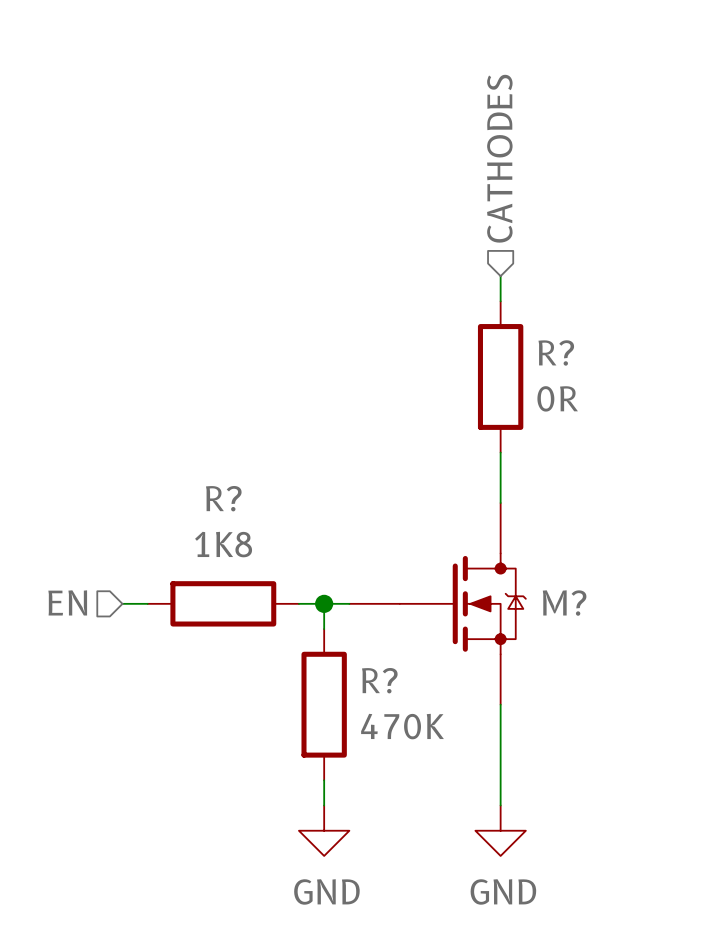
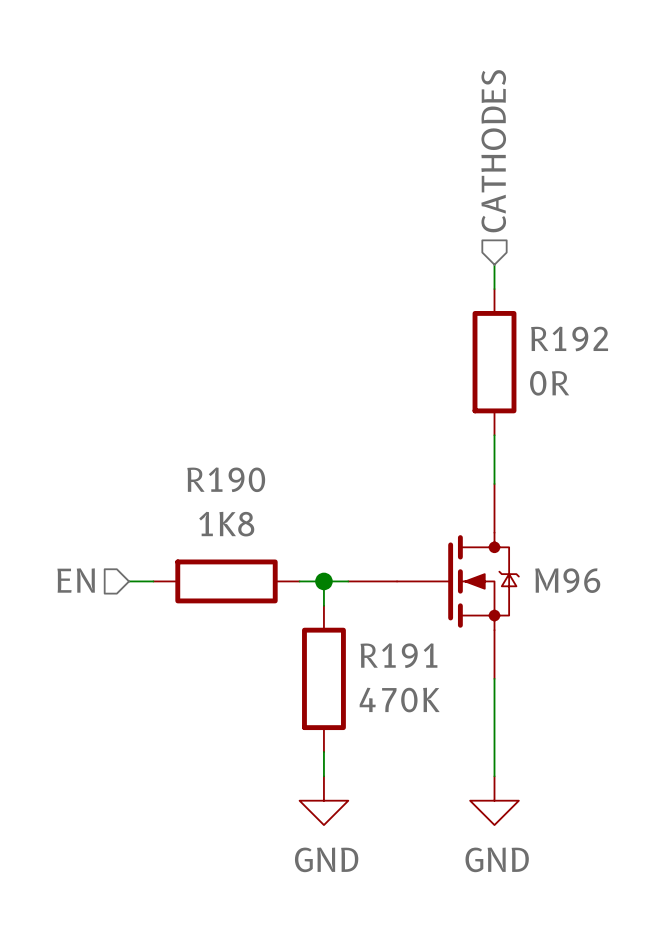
R? name: R? (556, 352) -> R192 (569, 338)
R? name: R? (223, 498) -> R190 (226, 479)
M? name: M? (564, 603) -> M96 (567, 580)
R? name: R? (379, 680) -> R191 (398, 655)

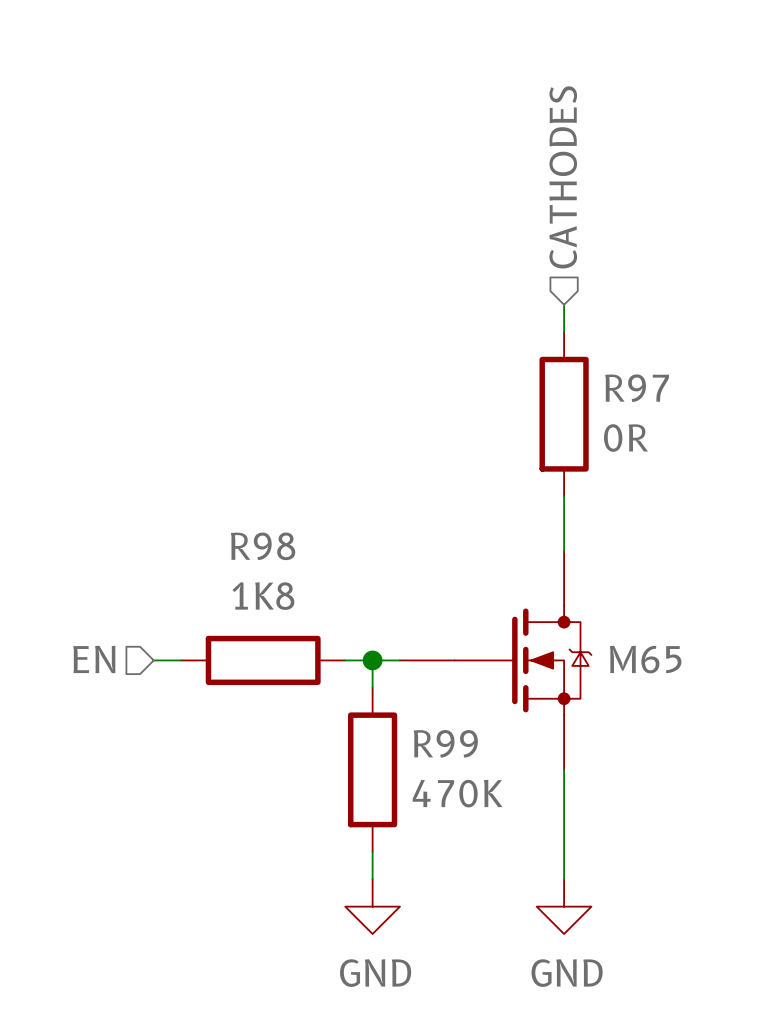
R192 name: R192 (569, 338) -> R97 (637, 388)
R190 name: R190 (226, 479) -> R98 (263, 546)
M96 name: M96 (567, 580) -> M65 (645, 659)
R191 name: R191 (398, 655) -> R99 (445, 743)

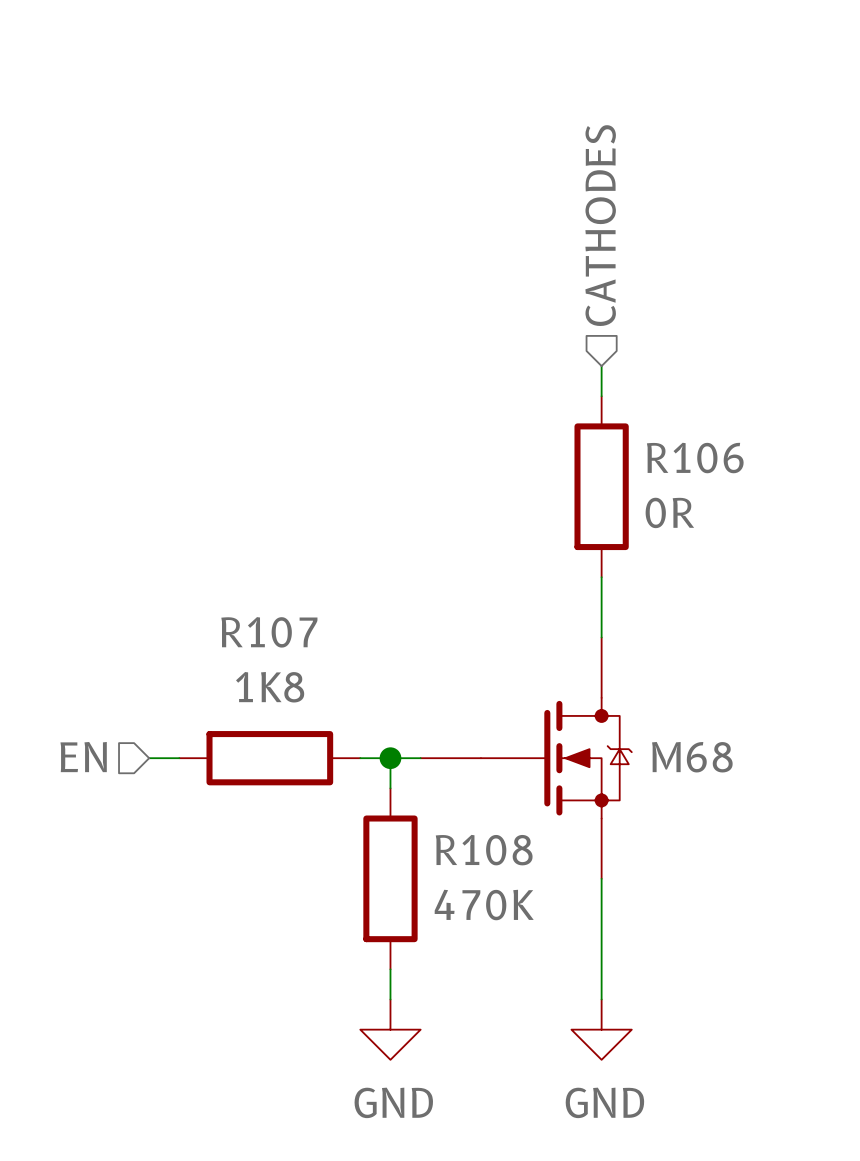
R97 name: R97 (637, 388) -> R106 (695, 458)
R98 name: R98 (263, 546) -> R107 (269, 632)
M65 name: M65 (645, 659) -> M68 (692, 757)
R99 name: R99 (445, 743) -> R108 (484, 850)

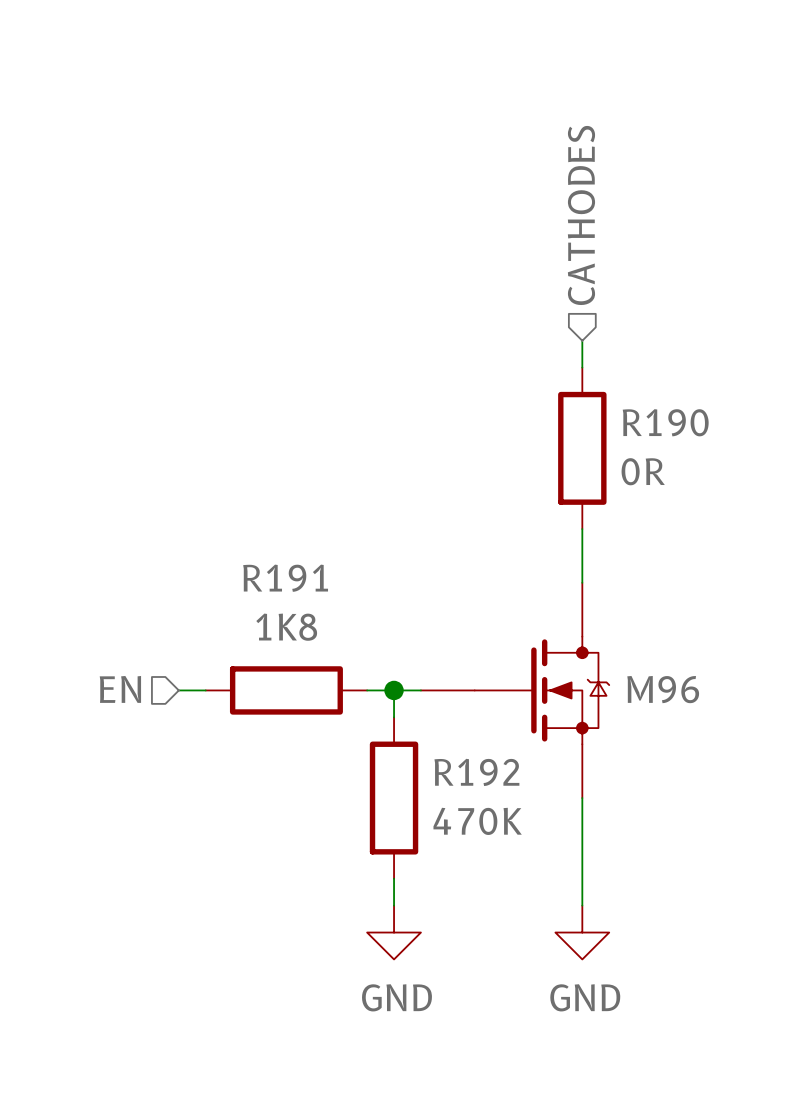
R106 name: R106 (695, 458) -> R190 (665, 422)
R107 name: R107 (269, 632) -> R191 (285, 578)
M68 name: M68 (692, 757) -> M96 (663, 689)
R108 name: R108 (484, 850) -> R192 (476, 772)

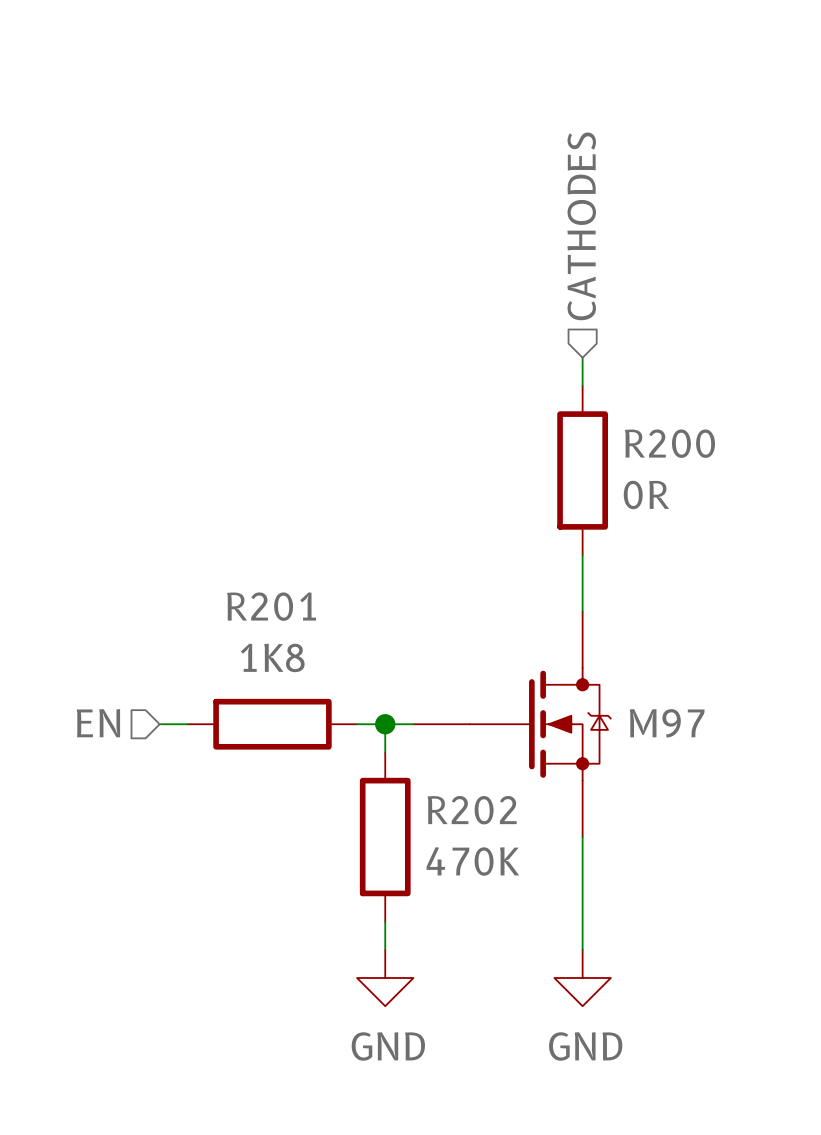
R190 name: R190 (665, 422) -> R200 (669, 443)
R191 name: R191 (285, 578) -> R201 (271, 606)
M96 name: M96 (663, 689) -> M97 (667, 723)
R192 name: R192 (476, 772) -> R202 (472, 810)

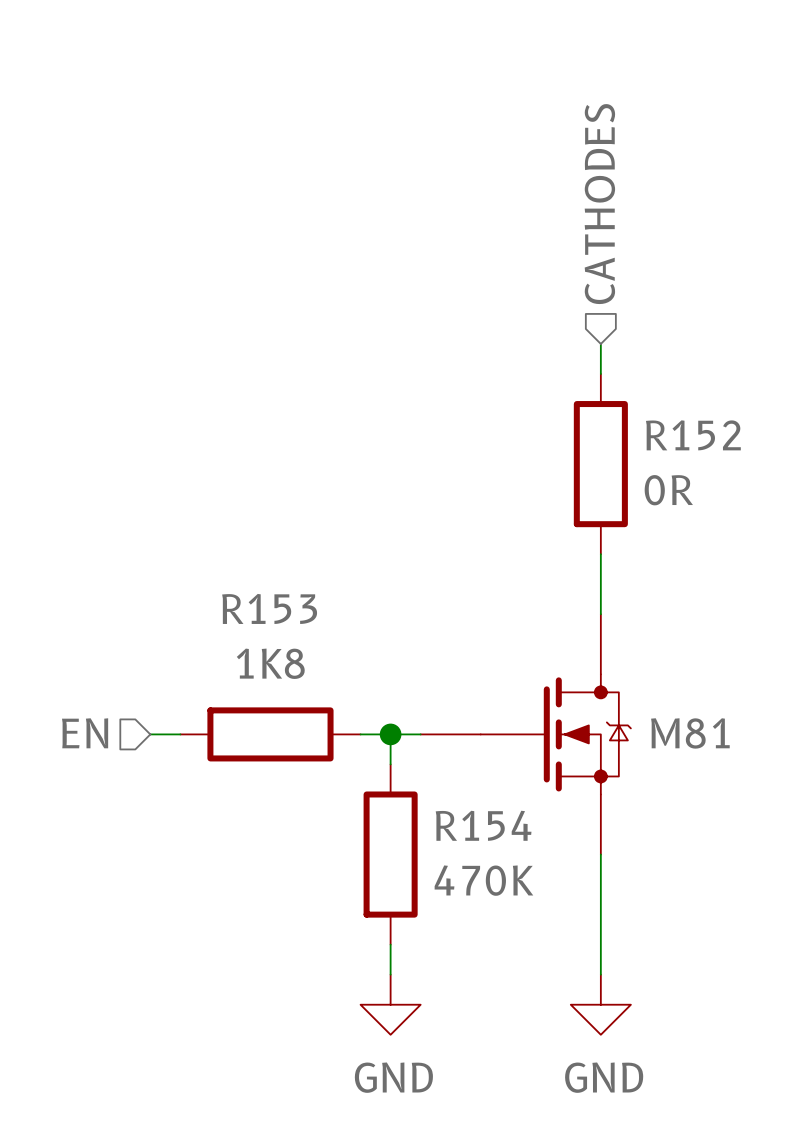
R200 name: R200 (669, 443) -> R152 (693, 435)
R201 name: R201 (271, 606) -> R153 (269, 608)
M97 name: M97 (667, 723) -> M81 (690, 733)
R202 name: R202 (472, 810) -> R154 (483, 825)

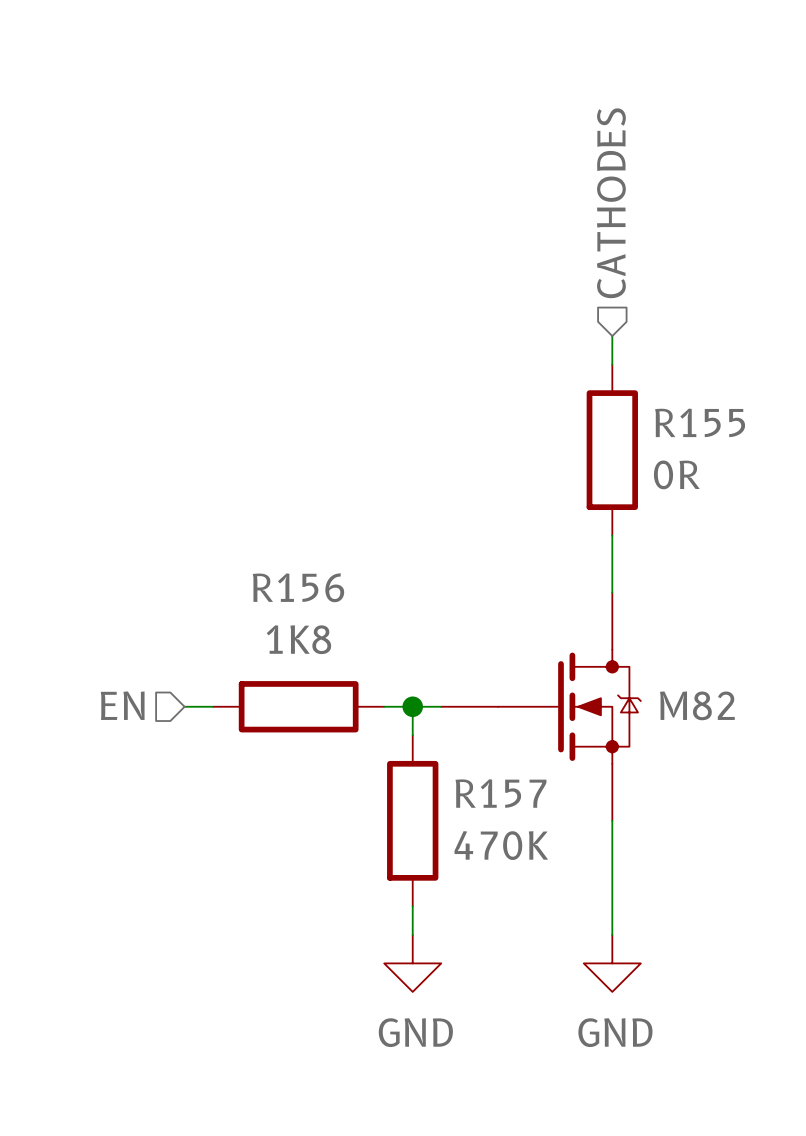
R152 name: R152 (693, 435) -> R155 (700, 422)
R153 name: R153 (269, 608) -> R156 (298, 587)
M81 name: M81 (690, 733) -> M82 (697, 705)
R154 name: R154 (483, 825) -> R157 (500, 793)

